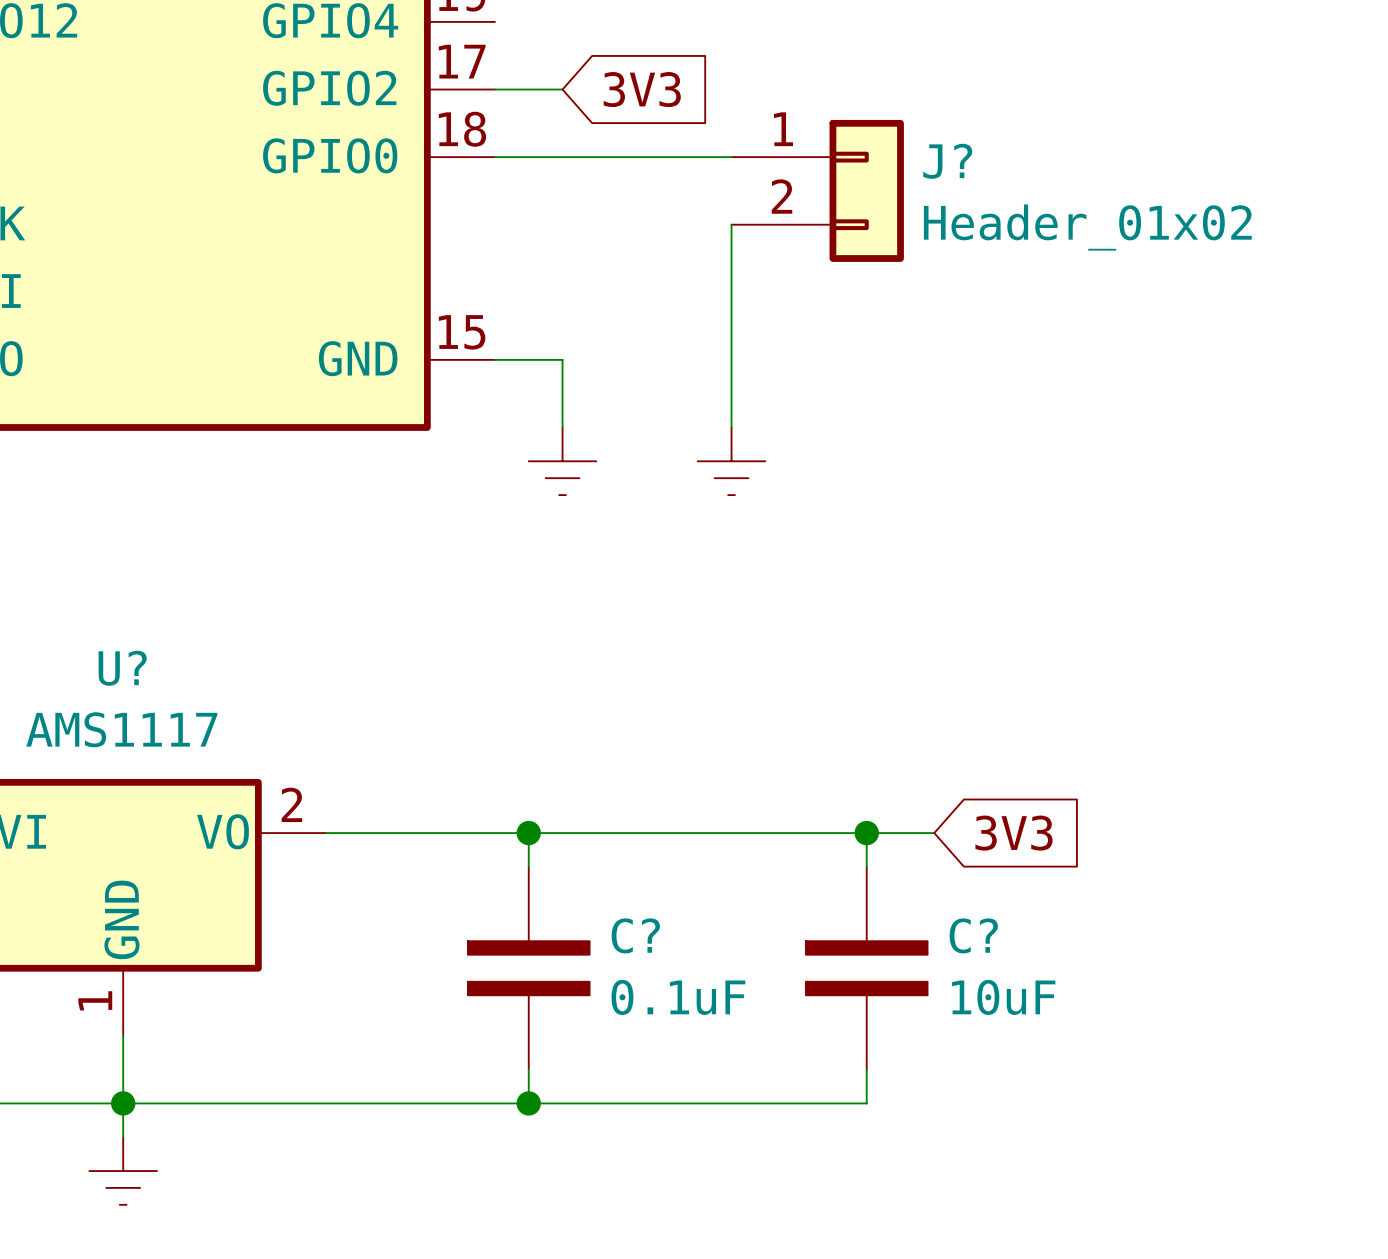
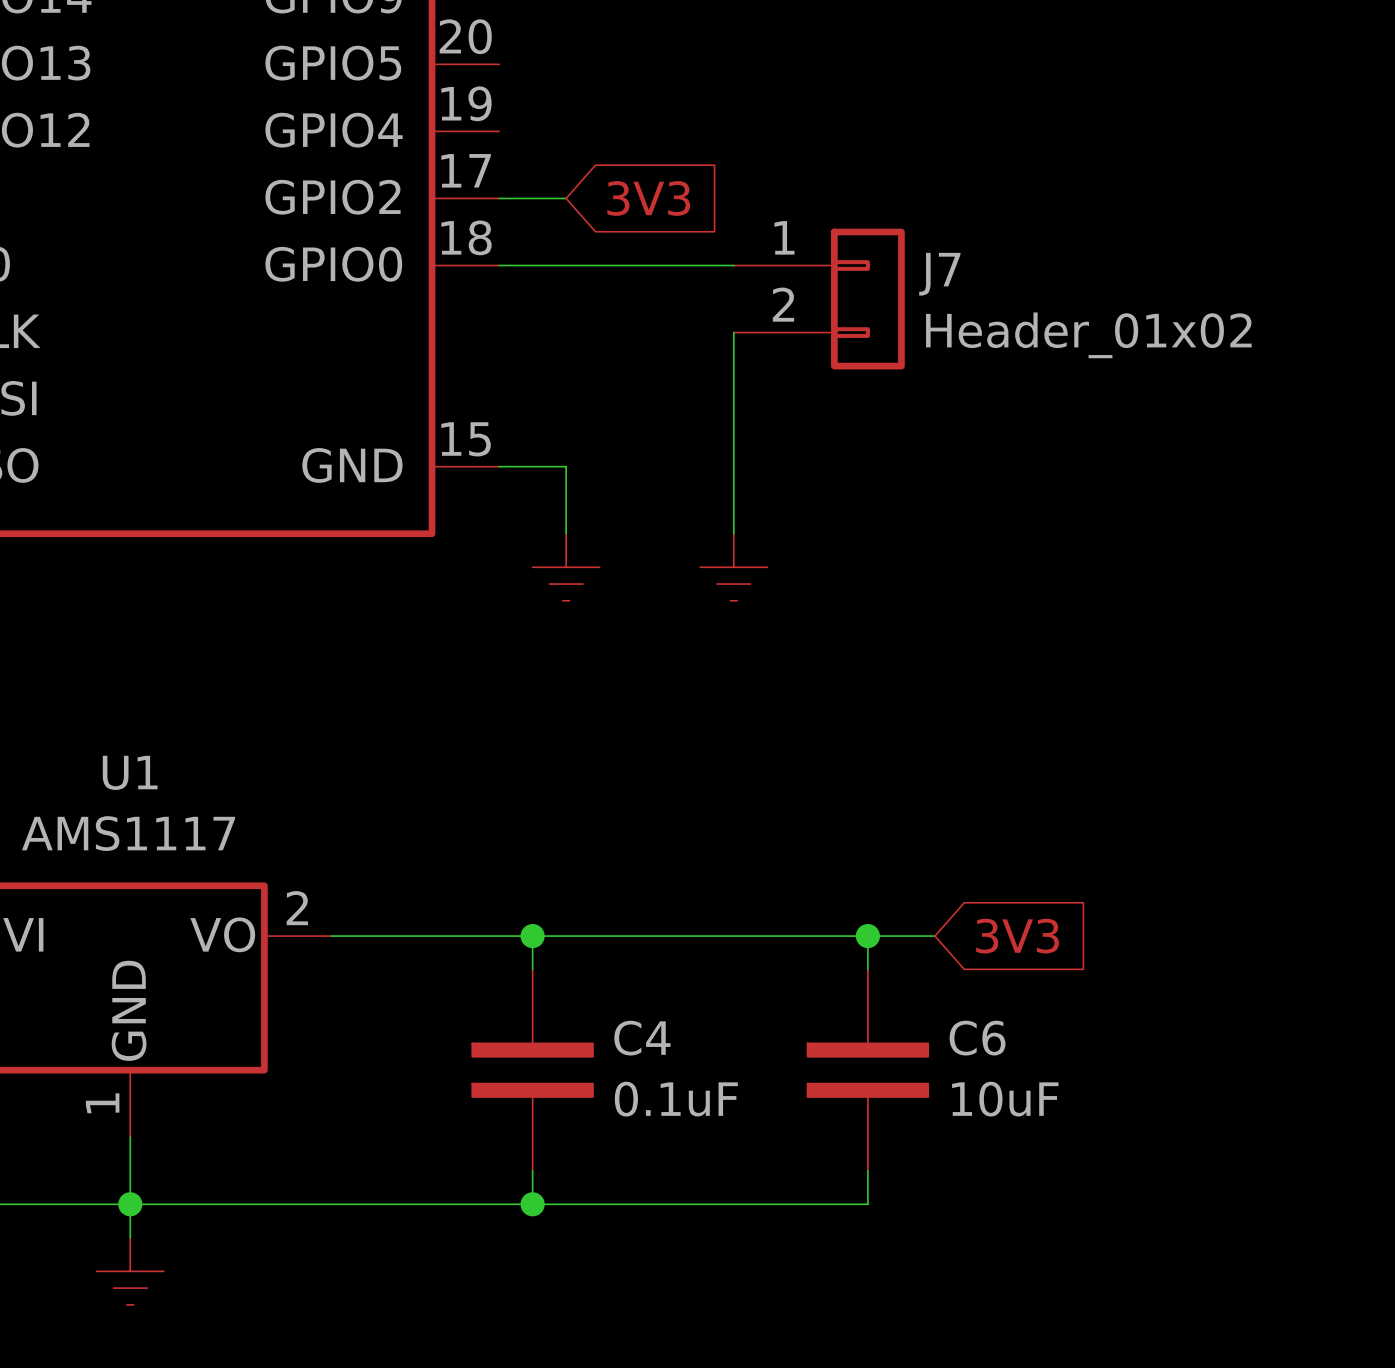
J? name: J? (947, 161) -> J7 (939, 274)
U? name: U? (122, 668) -> U1 (130, 772)
C? name: C? (635, 935) -> C4 (642, 1038)
C? name: C? (973, 935) -> C6 (977, 1038)

